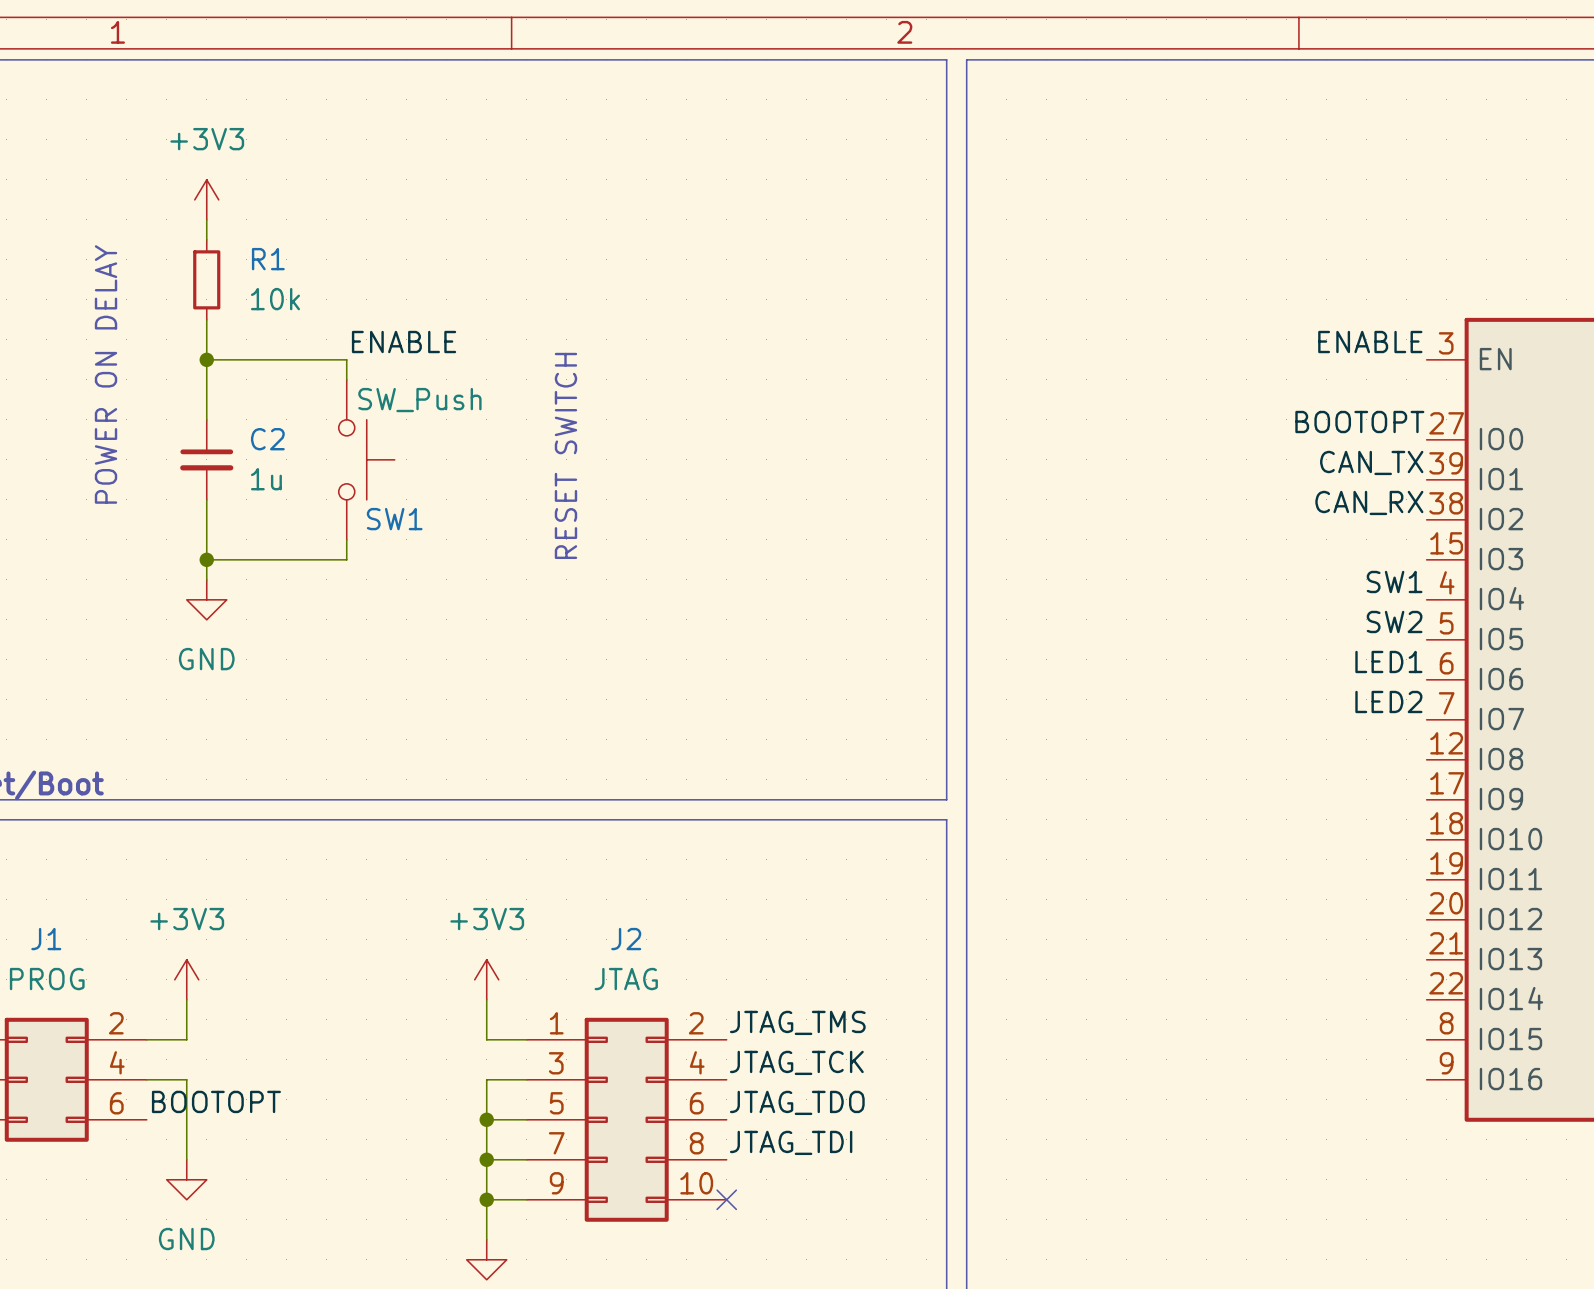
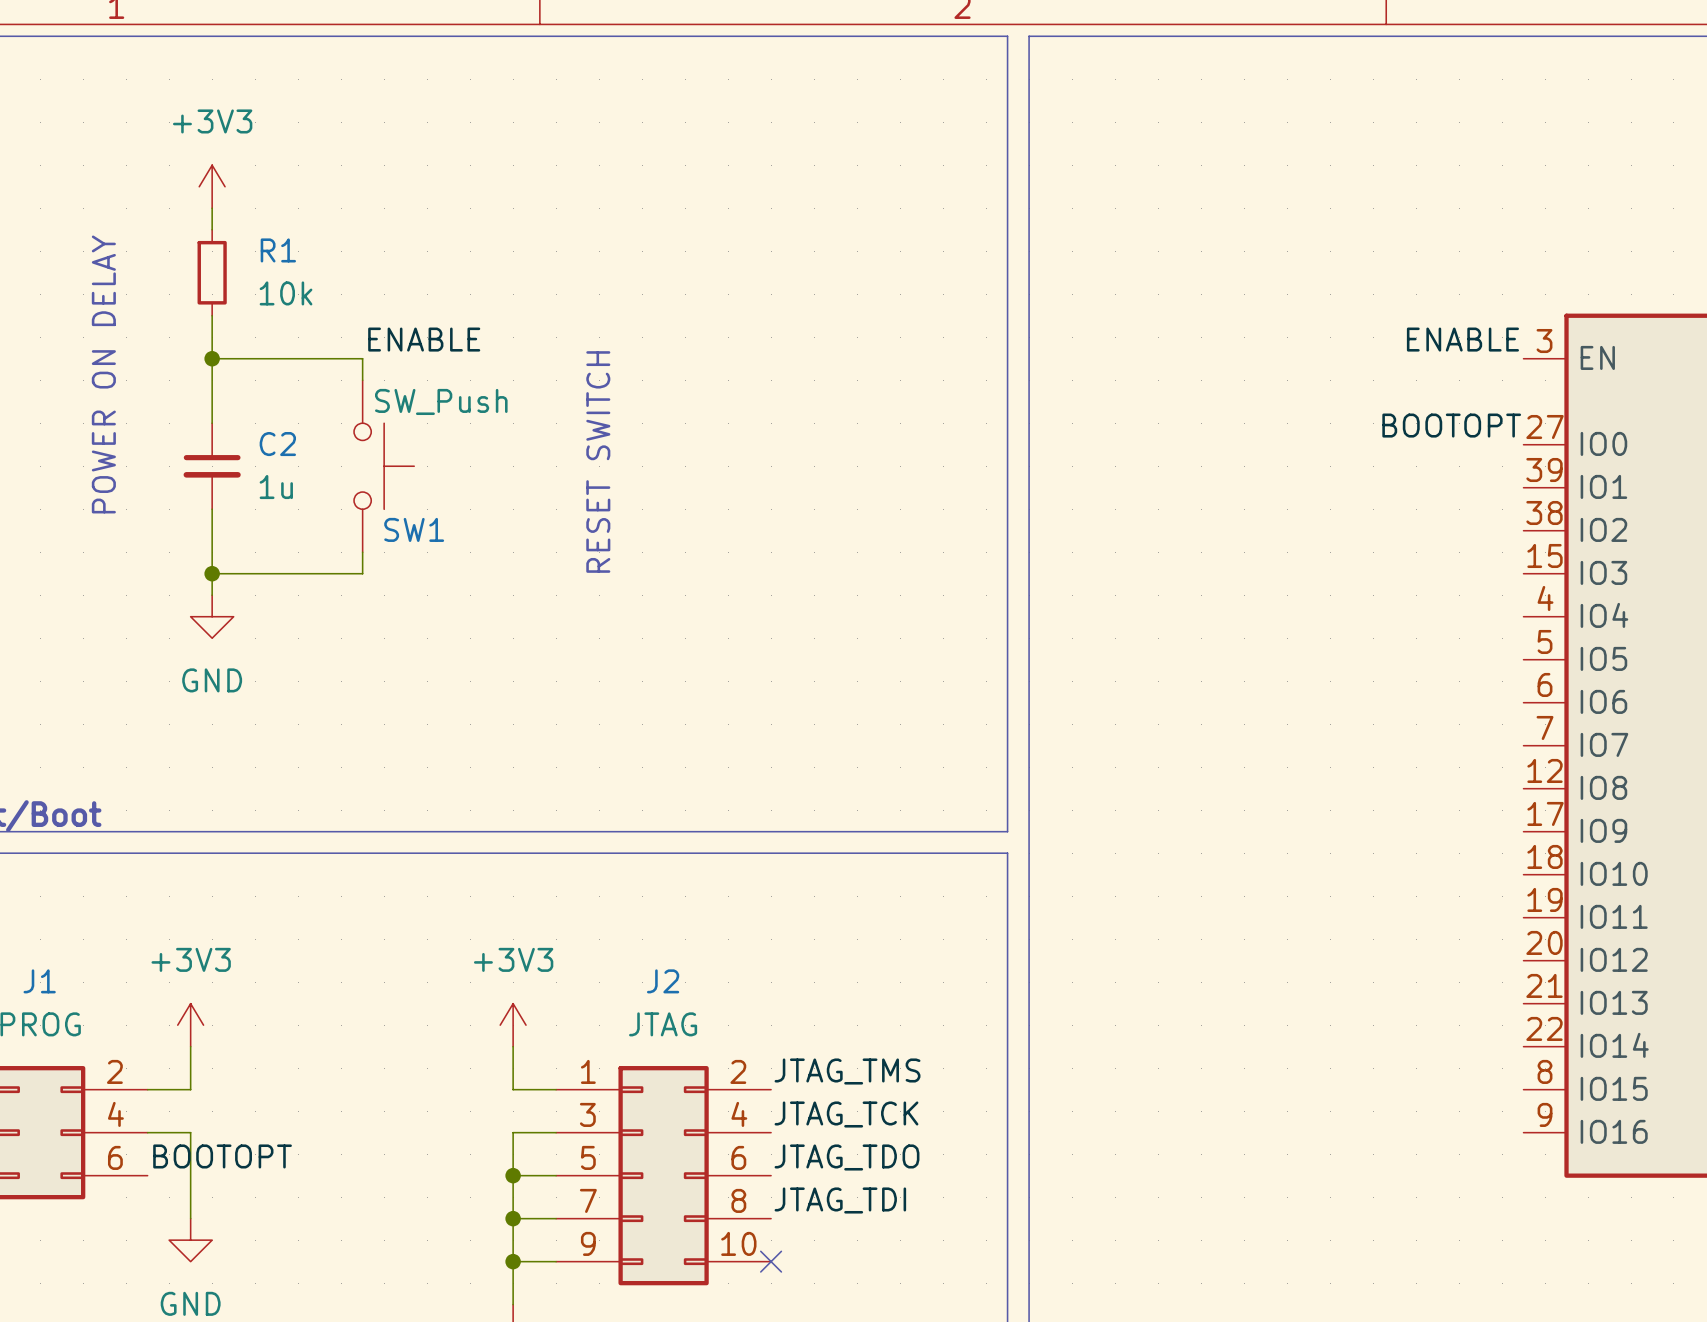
label: CAN_TX (1371, 462) -> none
label: CAN_RX (1369, 502) -> none
label: SW1 (1394, 581) -> none
label: SW2 (1394, 621) -> none
label: LED1 (1388, 661) -> none
label: LED2 (1388, 701) -> none

